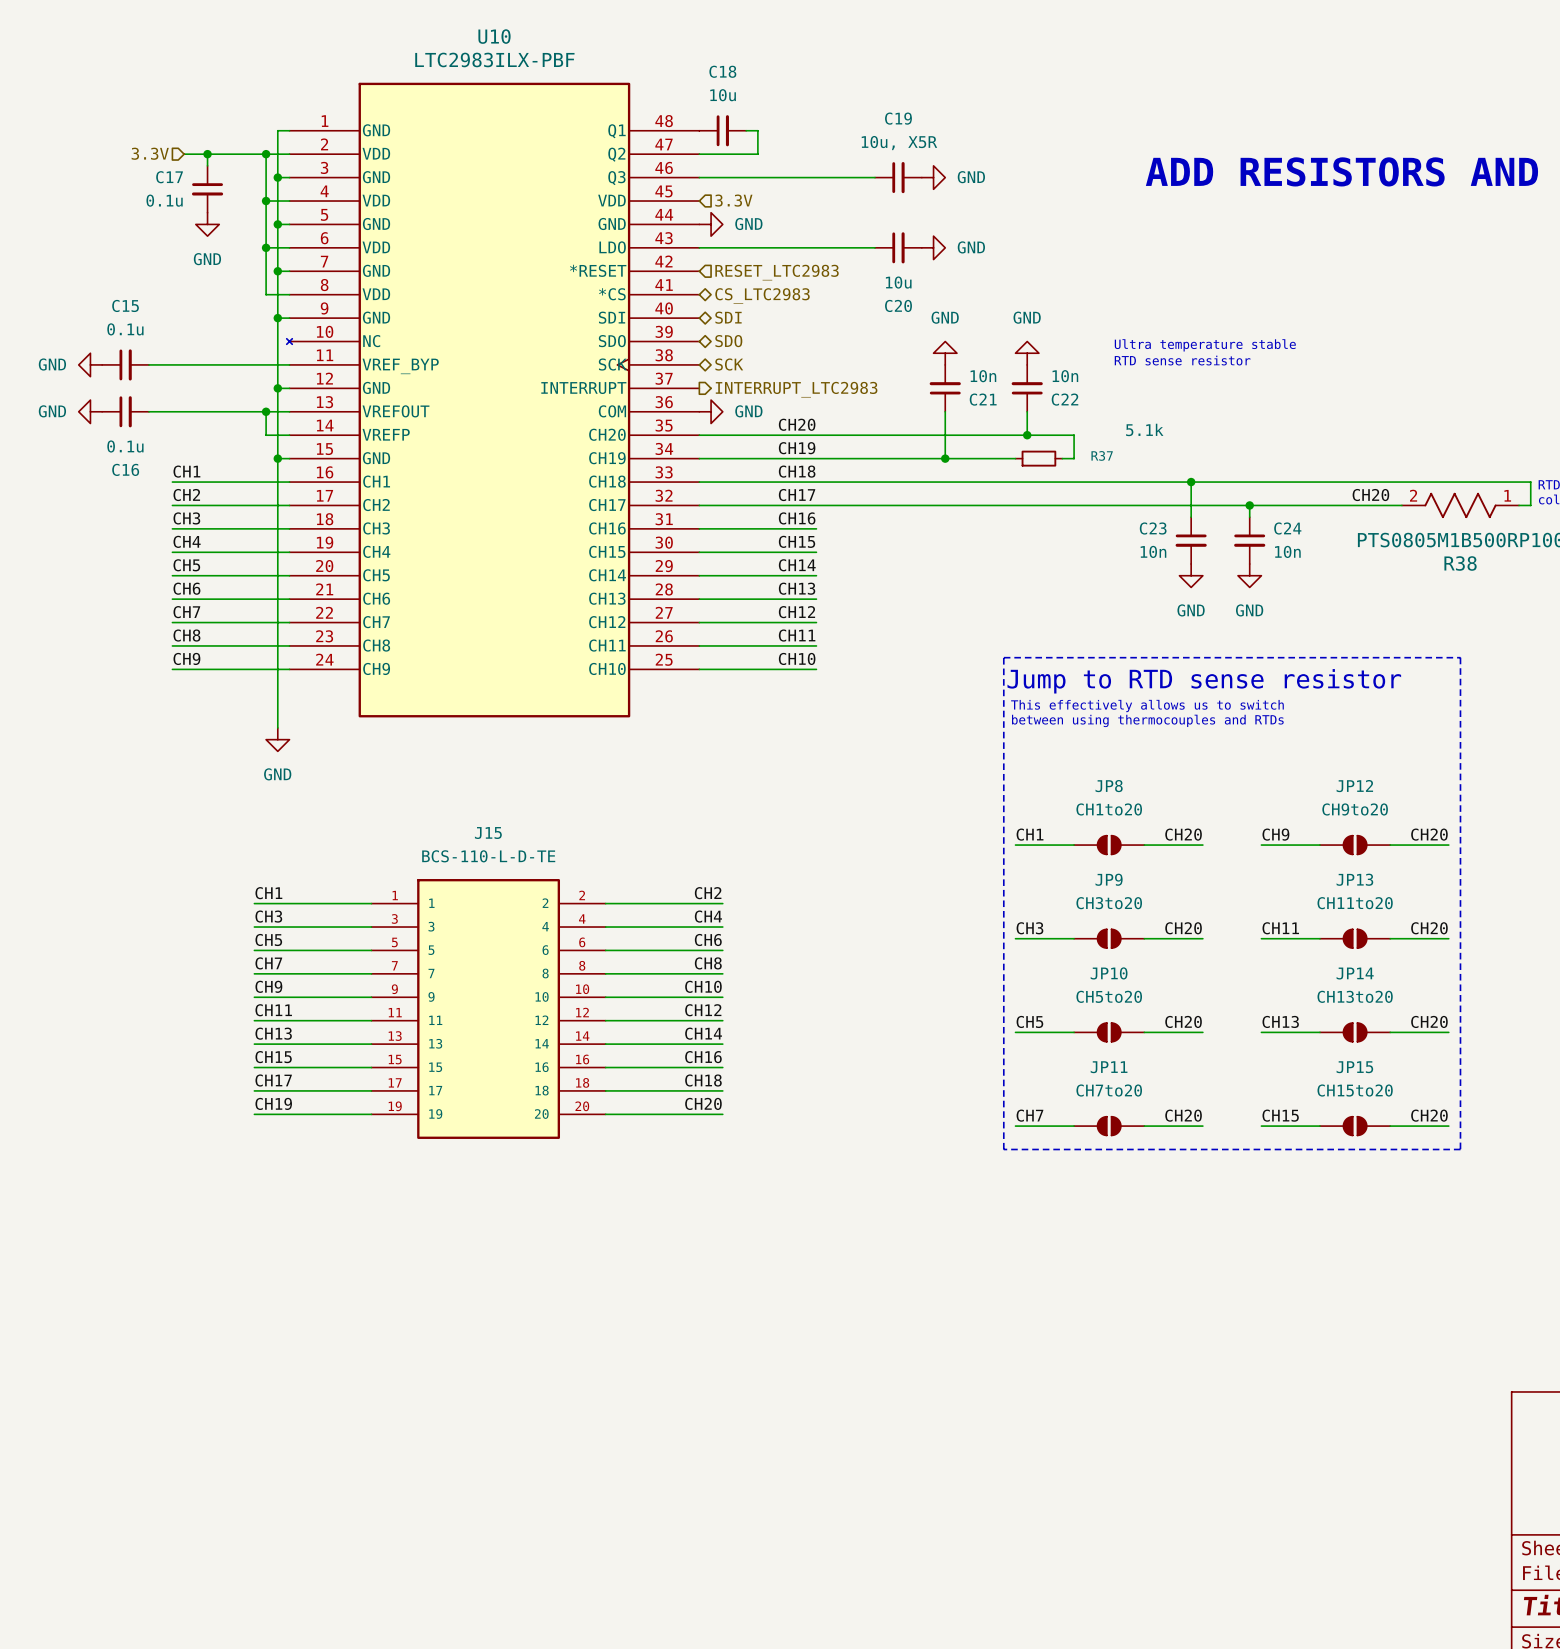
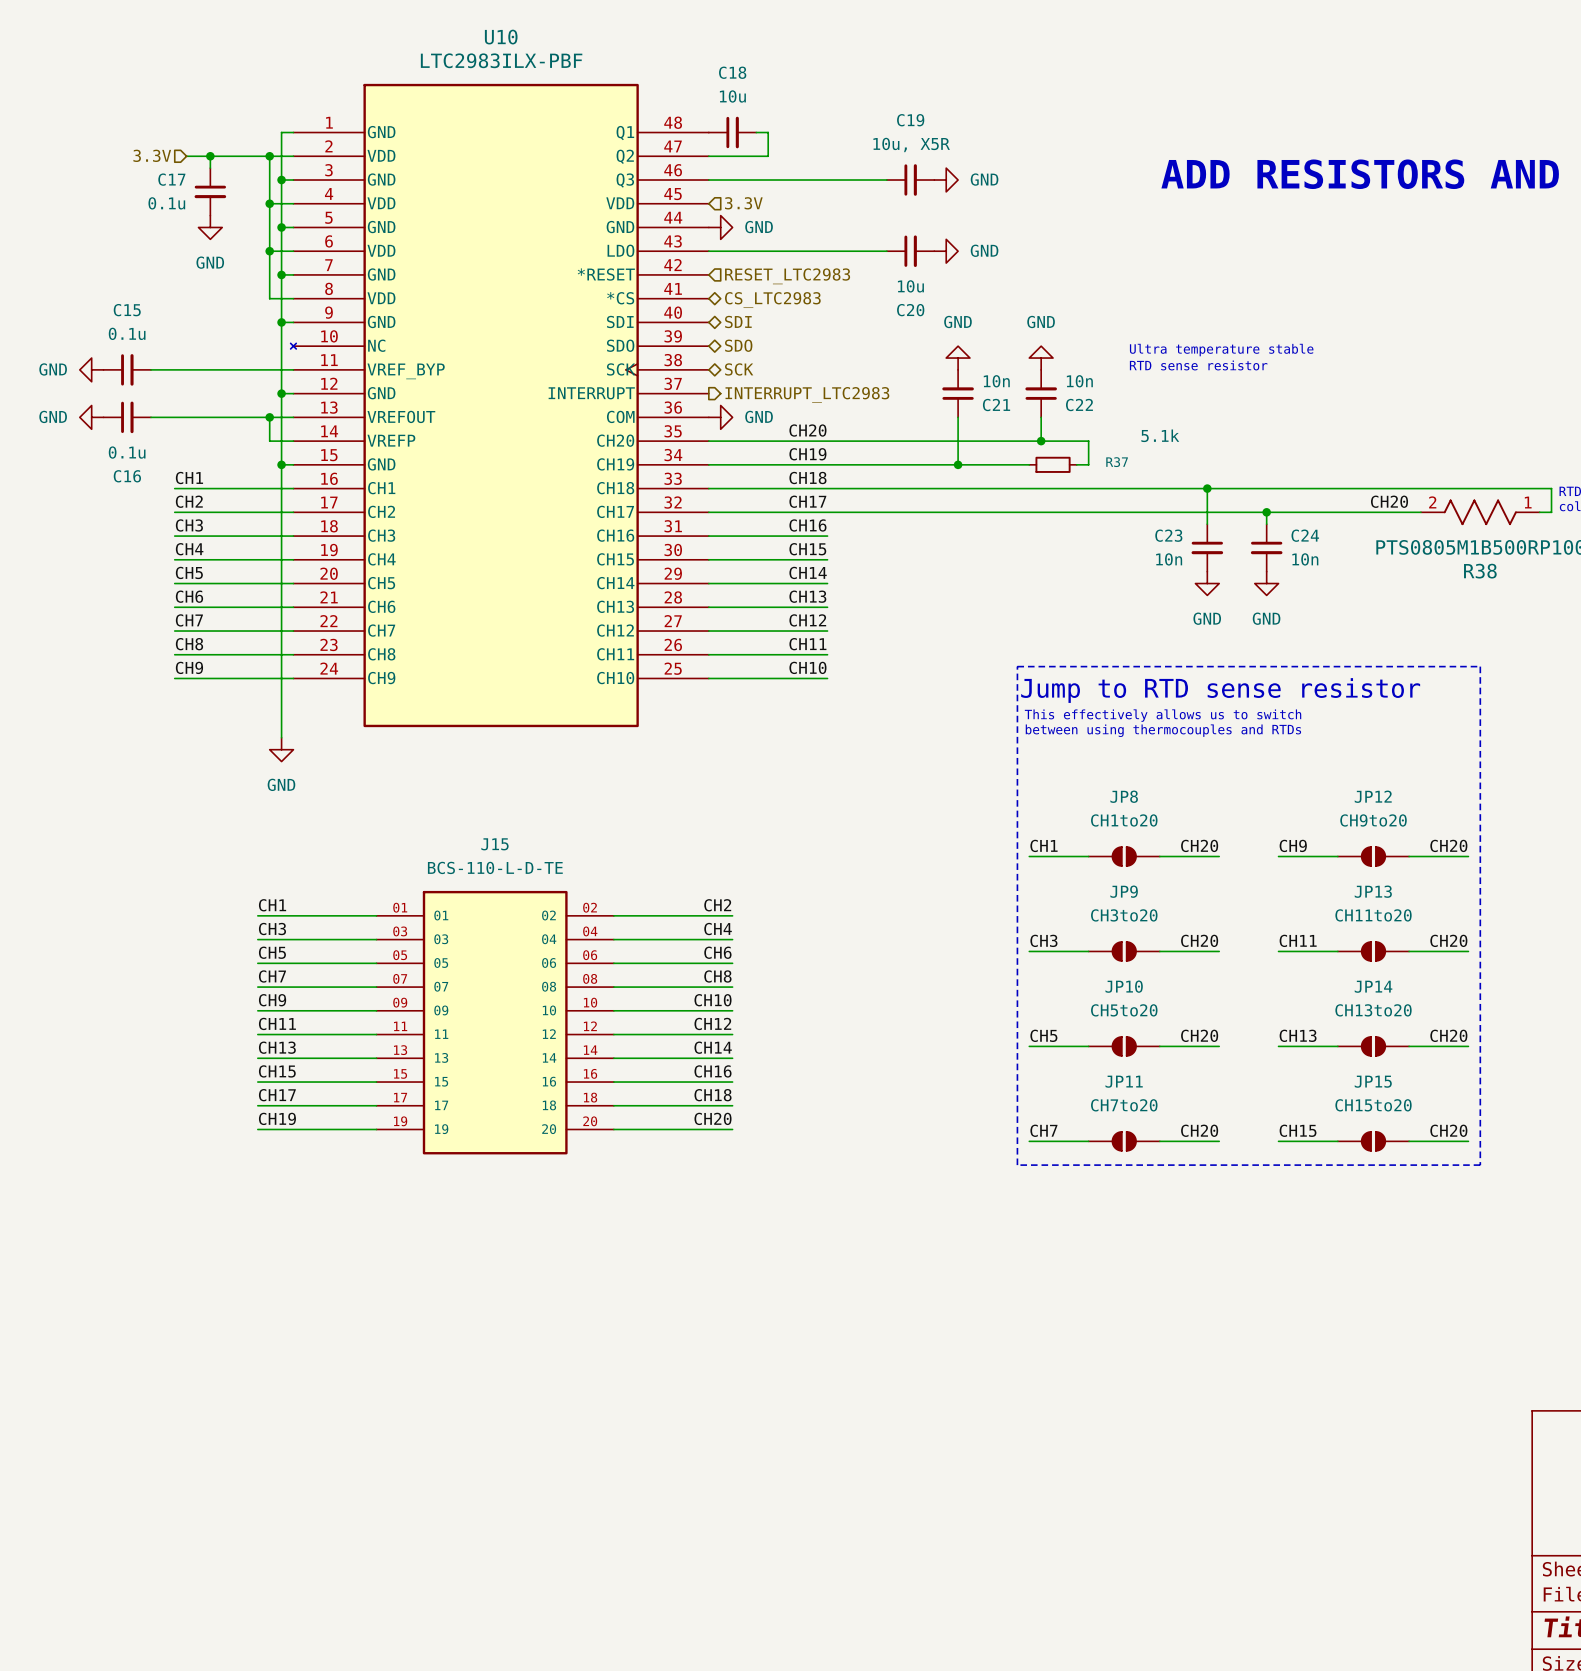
J15 symbol: [371, 879, 606, 1139] -> [376, 890, 614, 1155]

